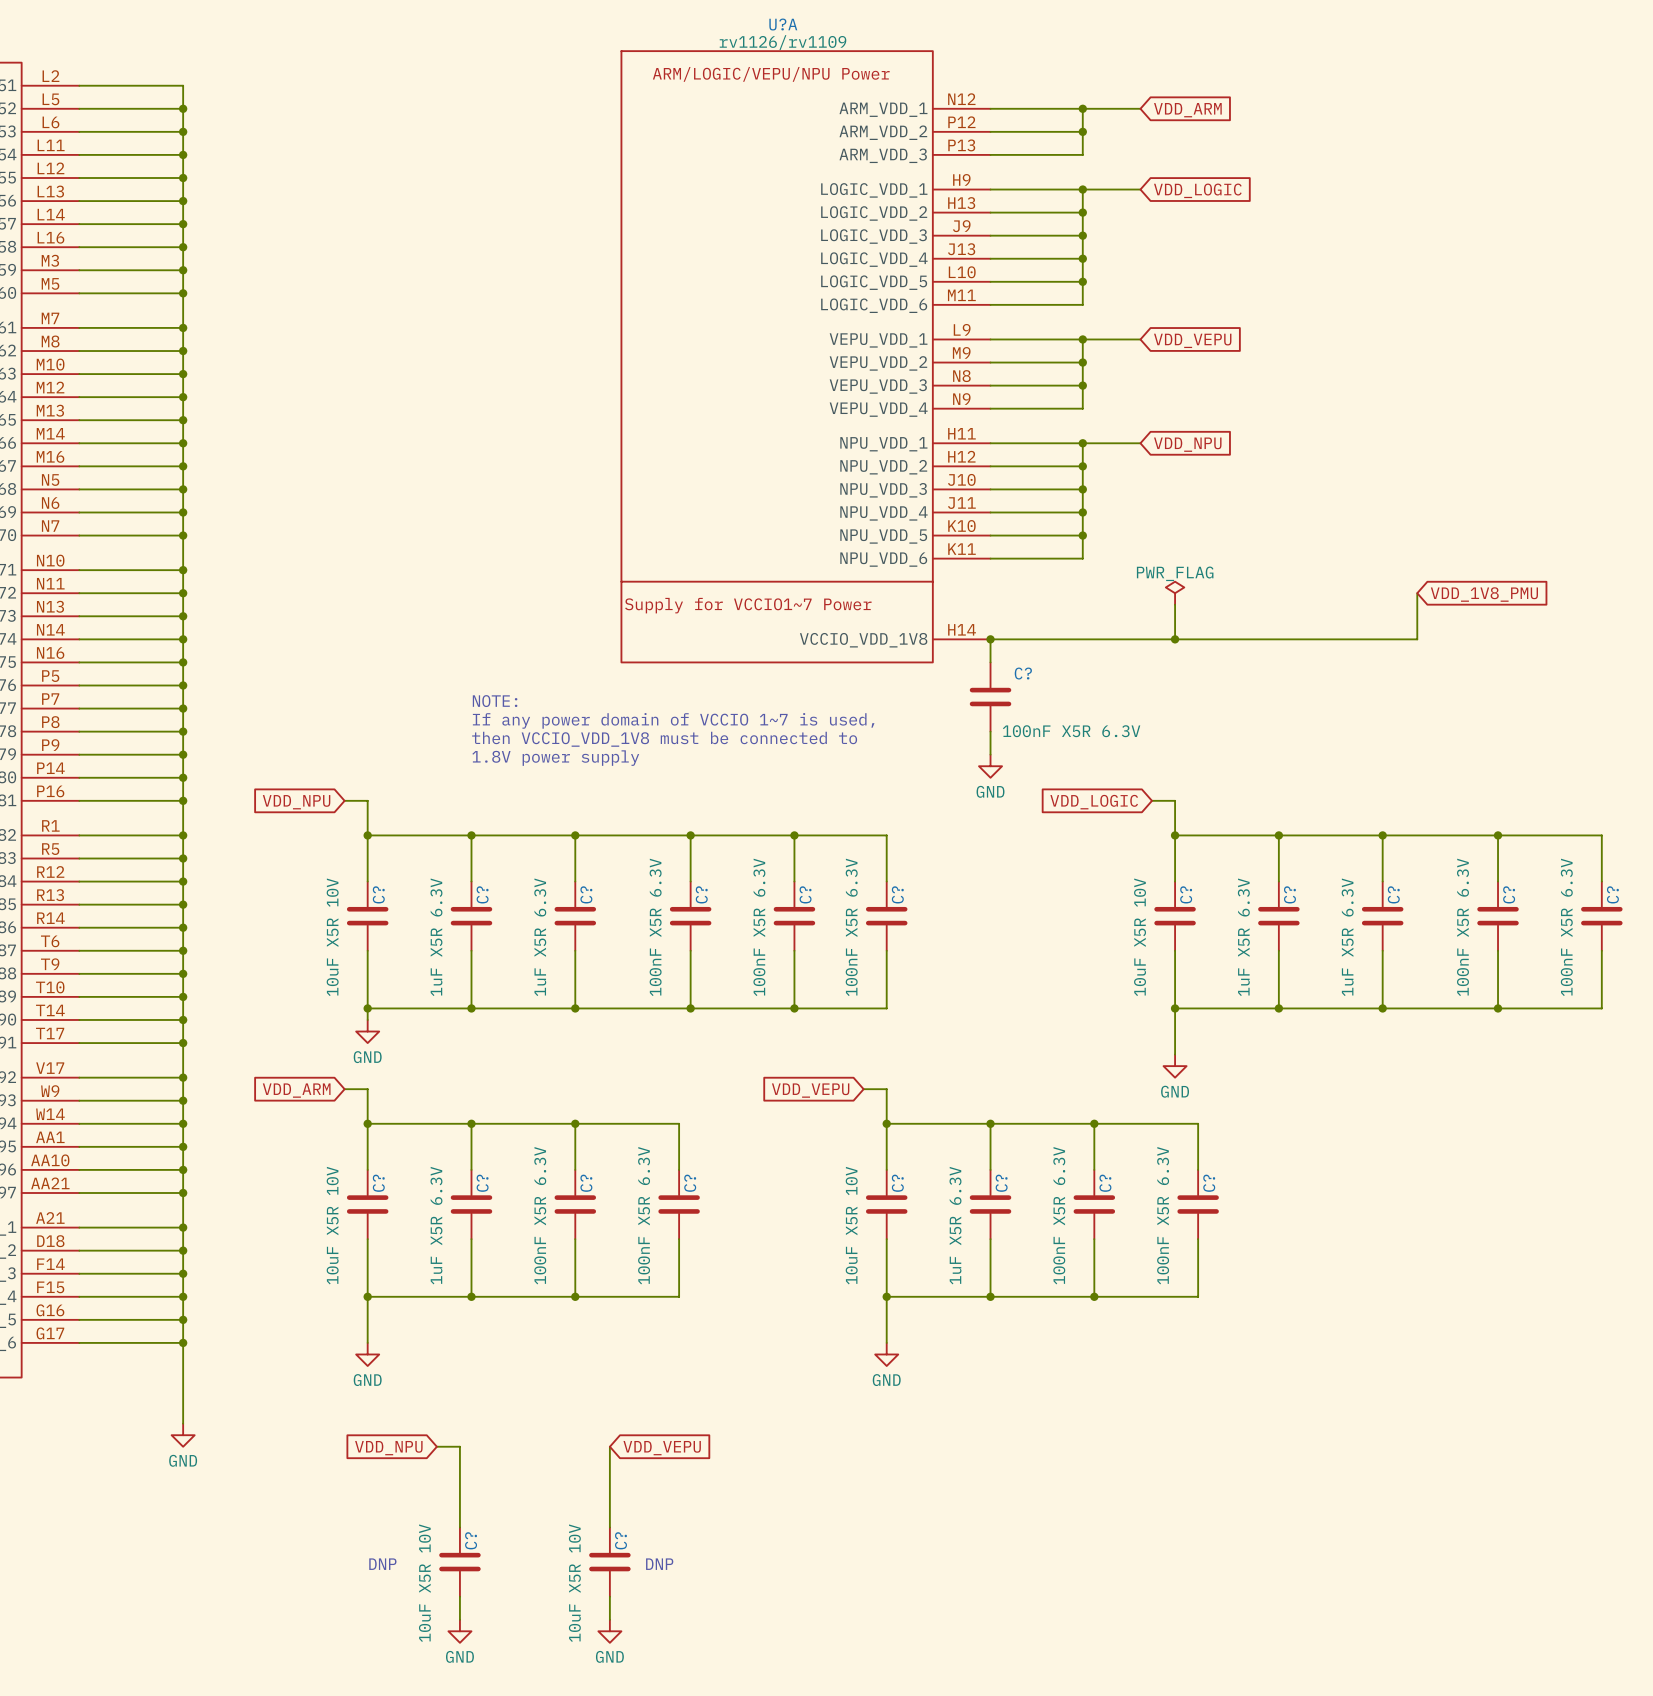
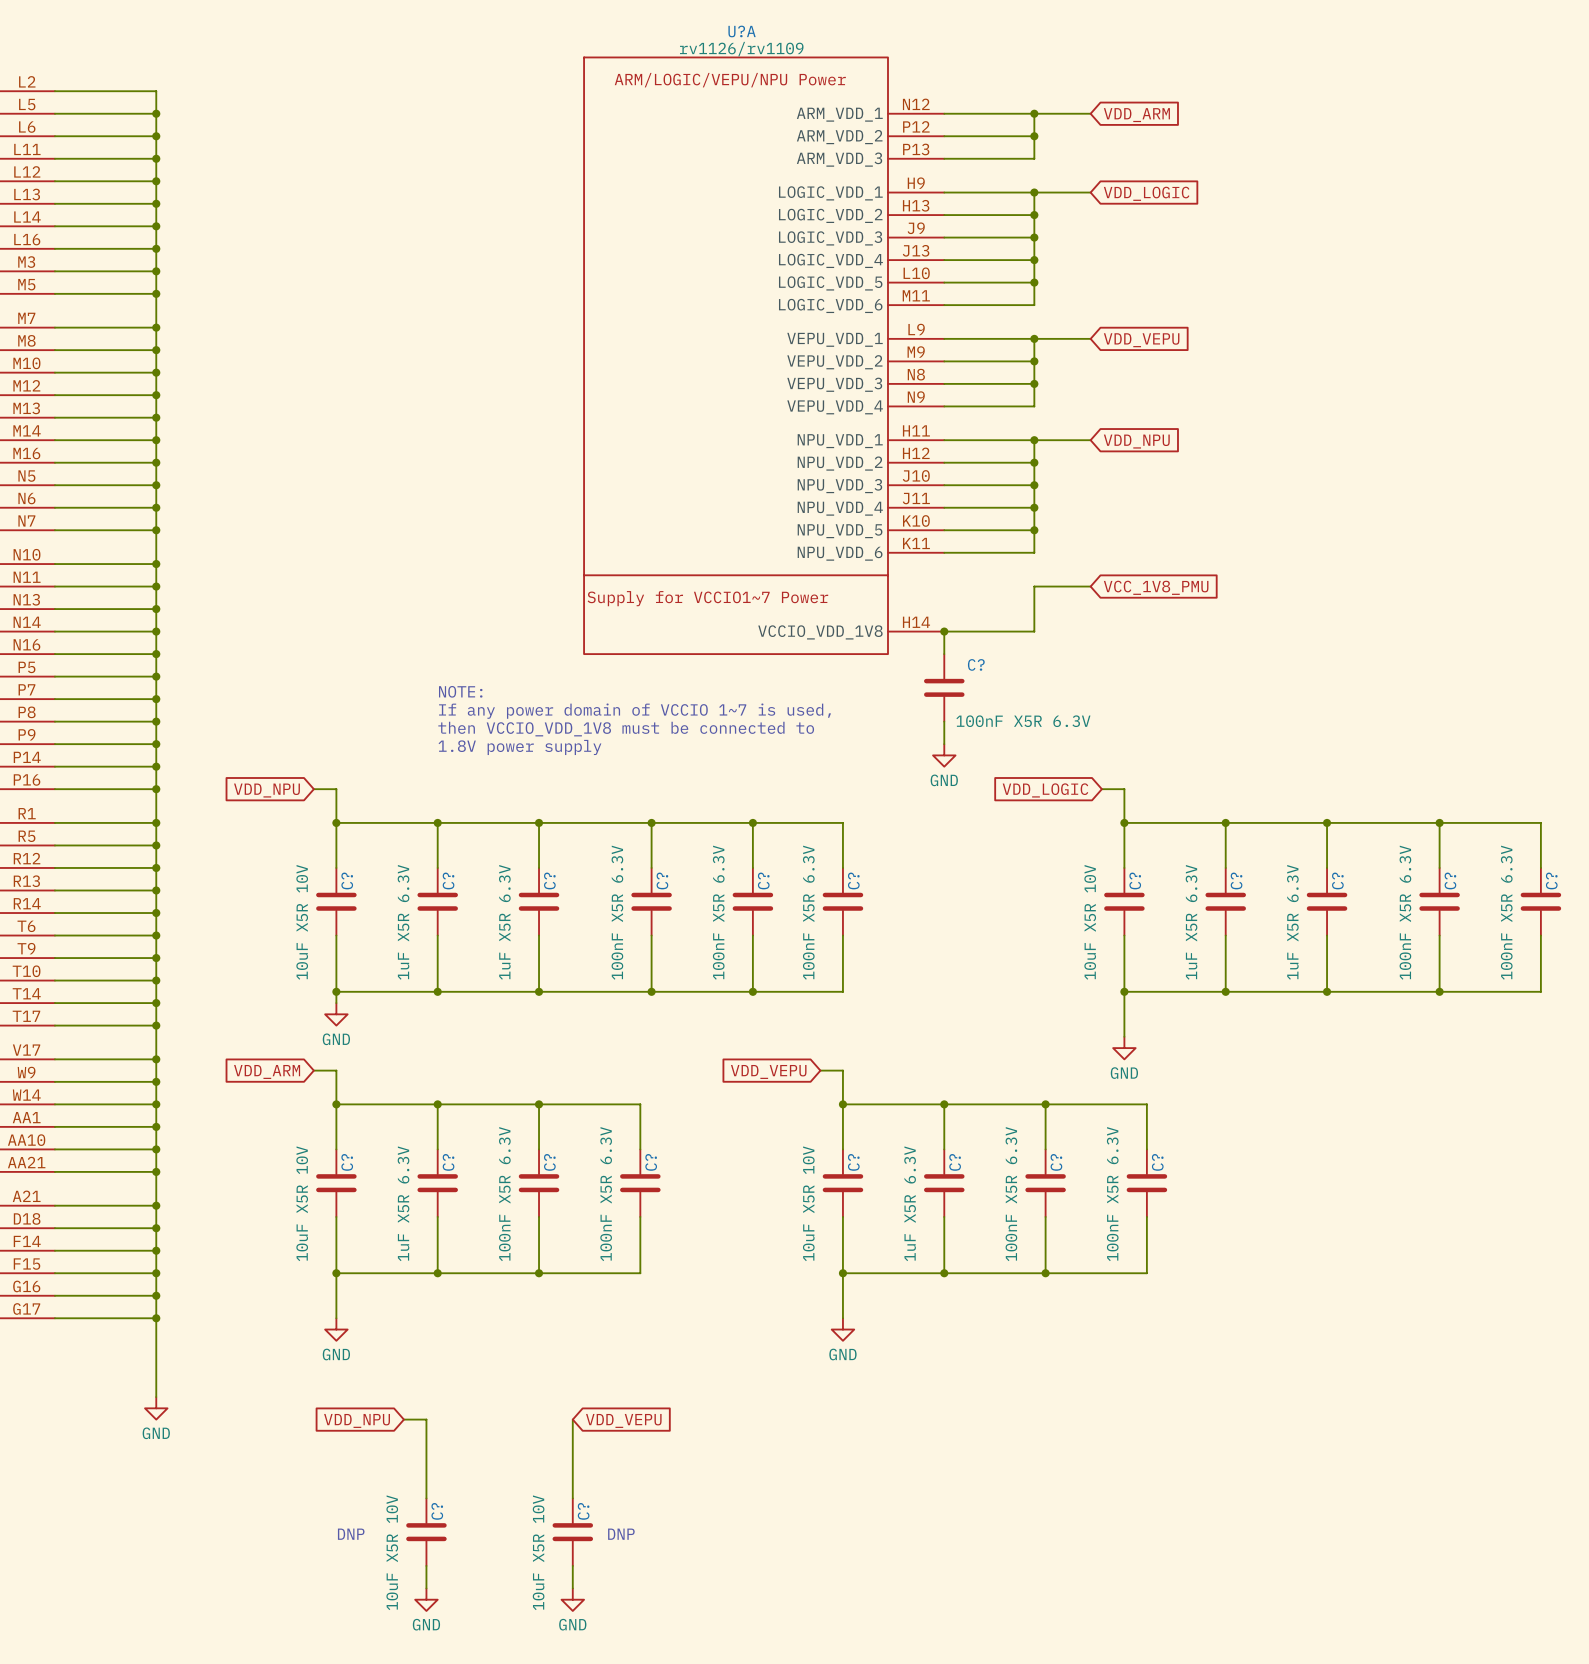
power symbol: PWR_FLAG (1175, 593) -> none
wire: (1417, 593) (1417, 639) (1082, 639) -> (1090, 586) (1034, 586) (1034, 631)
global label: none -> VCC_1V8_PMU (1156, 587)
global label: VDD_1V8_PMU (1484, 594) -> none
wire: (1175, 604) (1175, 639) -> none
junction: (1175, 639) -> none

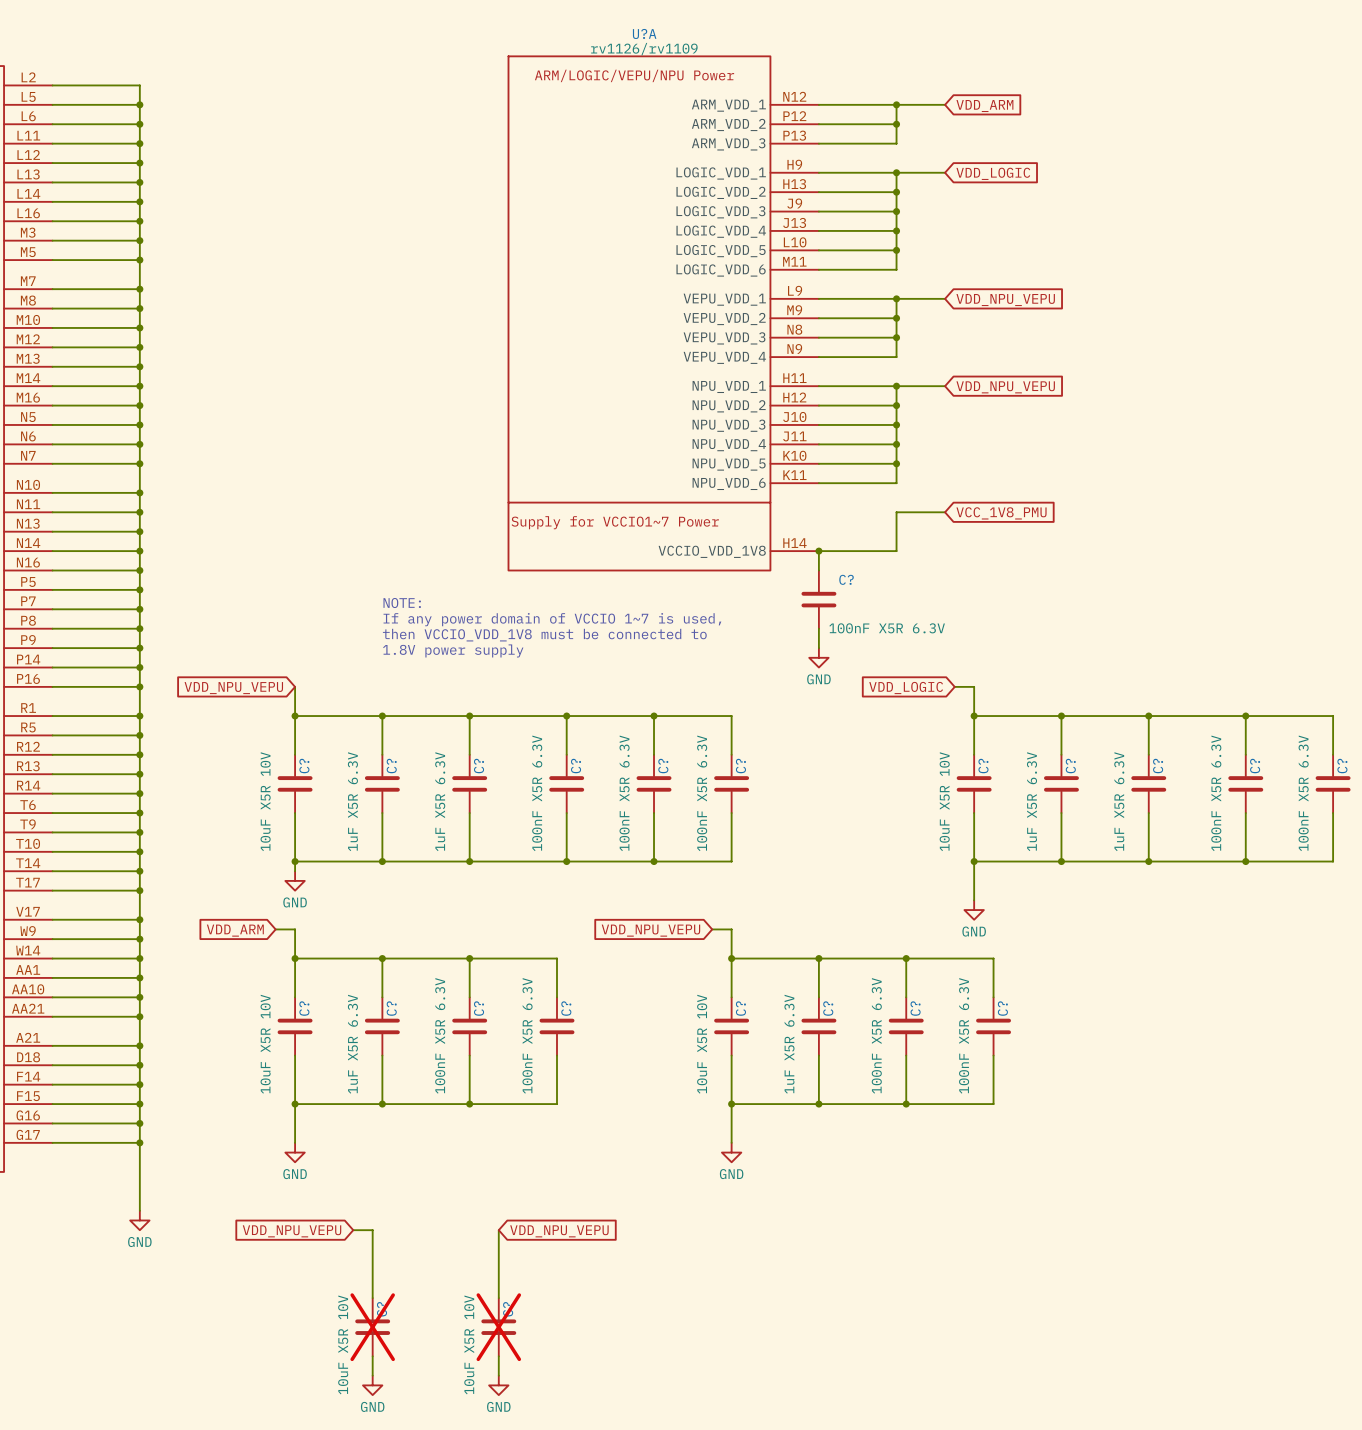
global label: VDD_VEPU (1141, 340) -> VDD_NPU_VEPU (1005, 300)
global label: VDD_NPU (1136, 441) -> VDD_NPU_VEPU (1005, 387)
wire: (313, 789) (336, 789) -> none
global label: VDD_NPU (266, 790) -> VDD_NPU_VEPU (233, 688)
global label: VDD_VEPU (768, 1071) -> VDD_NPU_VEPU (650, 930)
global label: VDD_NPU (357, 1420) -> VDD_NPU_VEPU (292, 1231)
global label: VDD_VEPU (623, 1420) -> VDD_NPU_VEPU (559, 1231)
C? do-not-place cross: none -> (372, 1327)
C? do-not-place cross: none -> (498, 1327)
text: DNP (351, 1534) -> none
text: DNP (621, 1534) -> none

